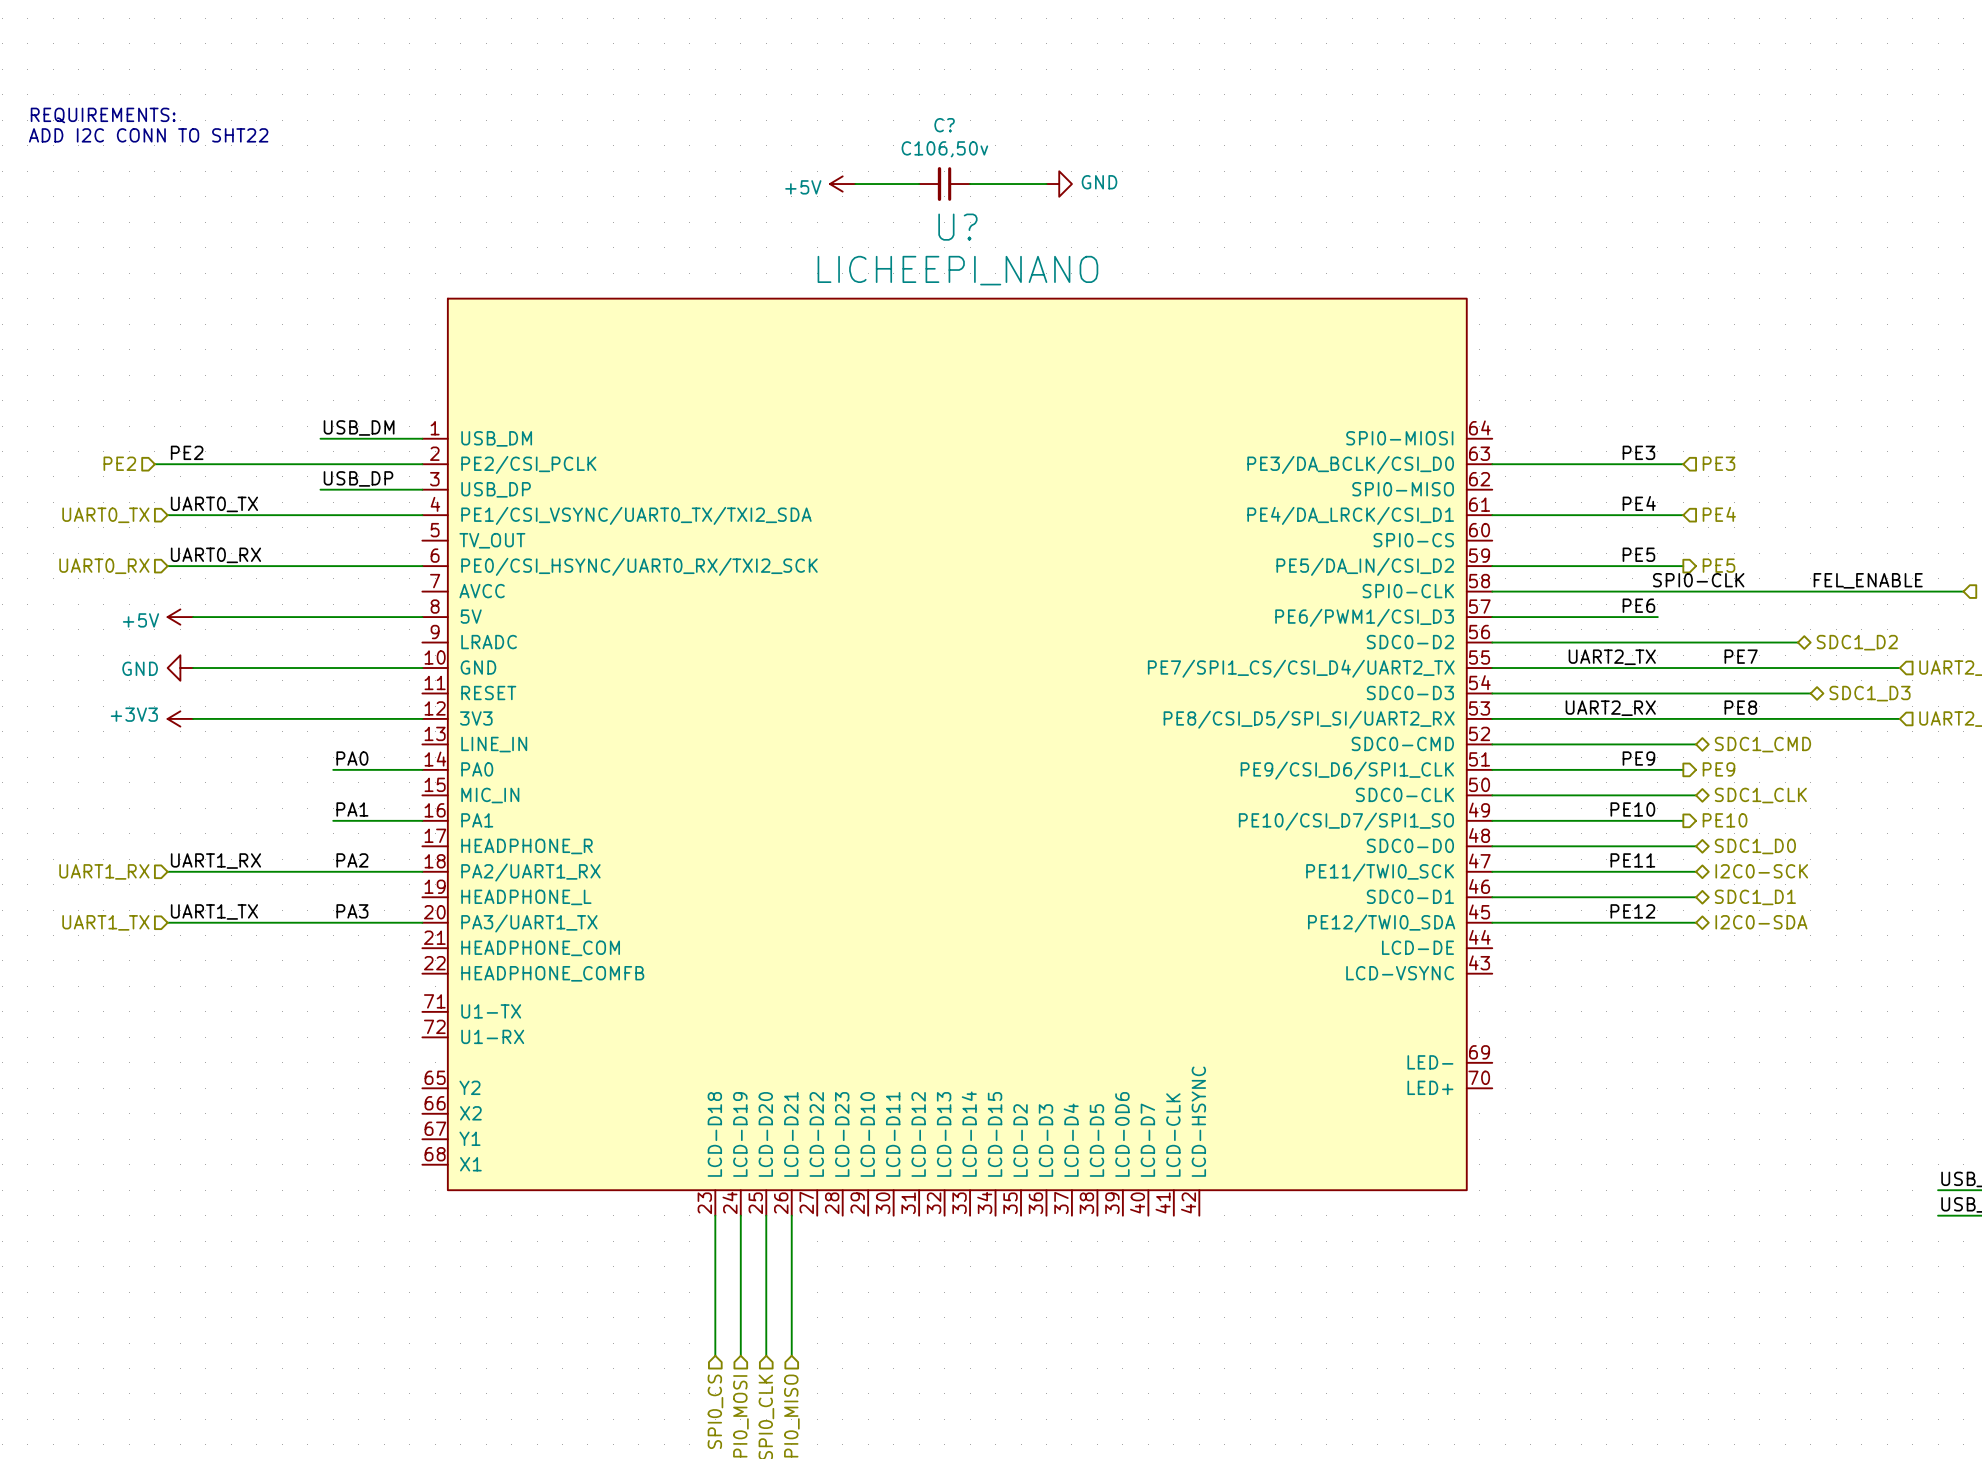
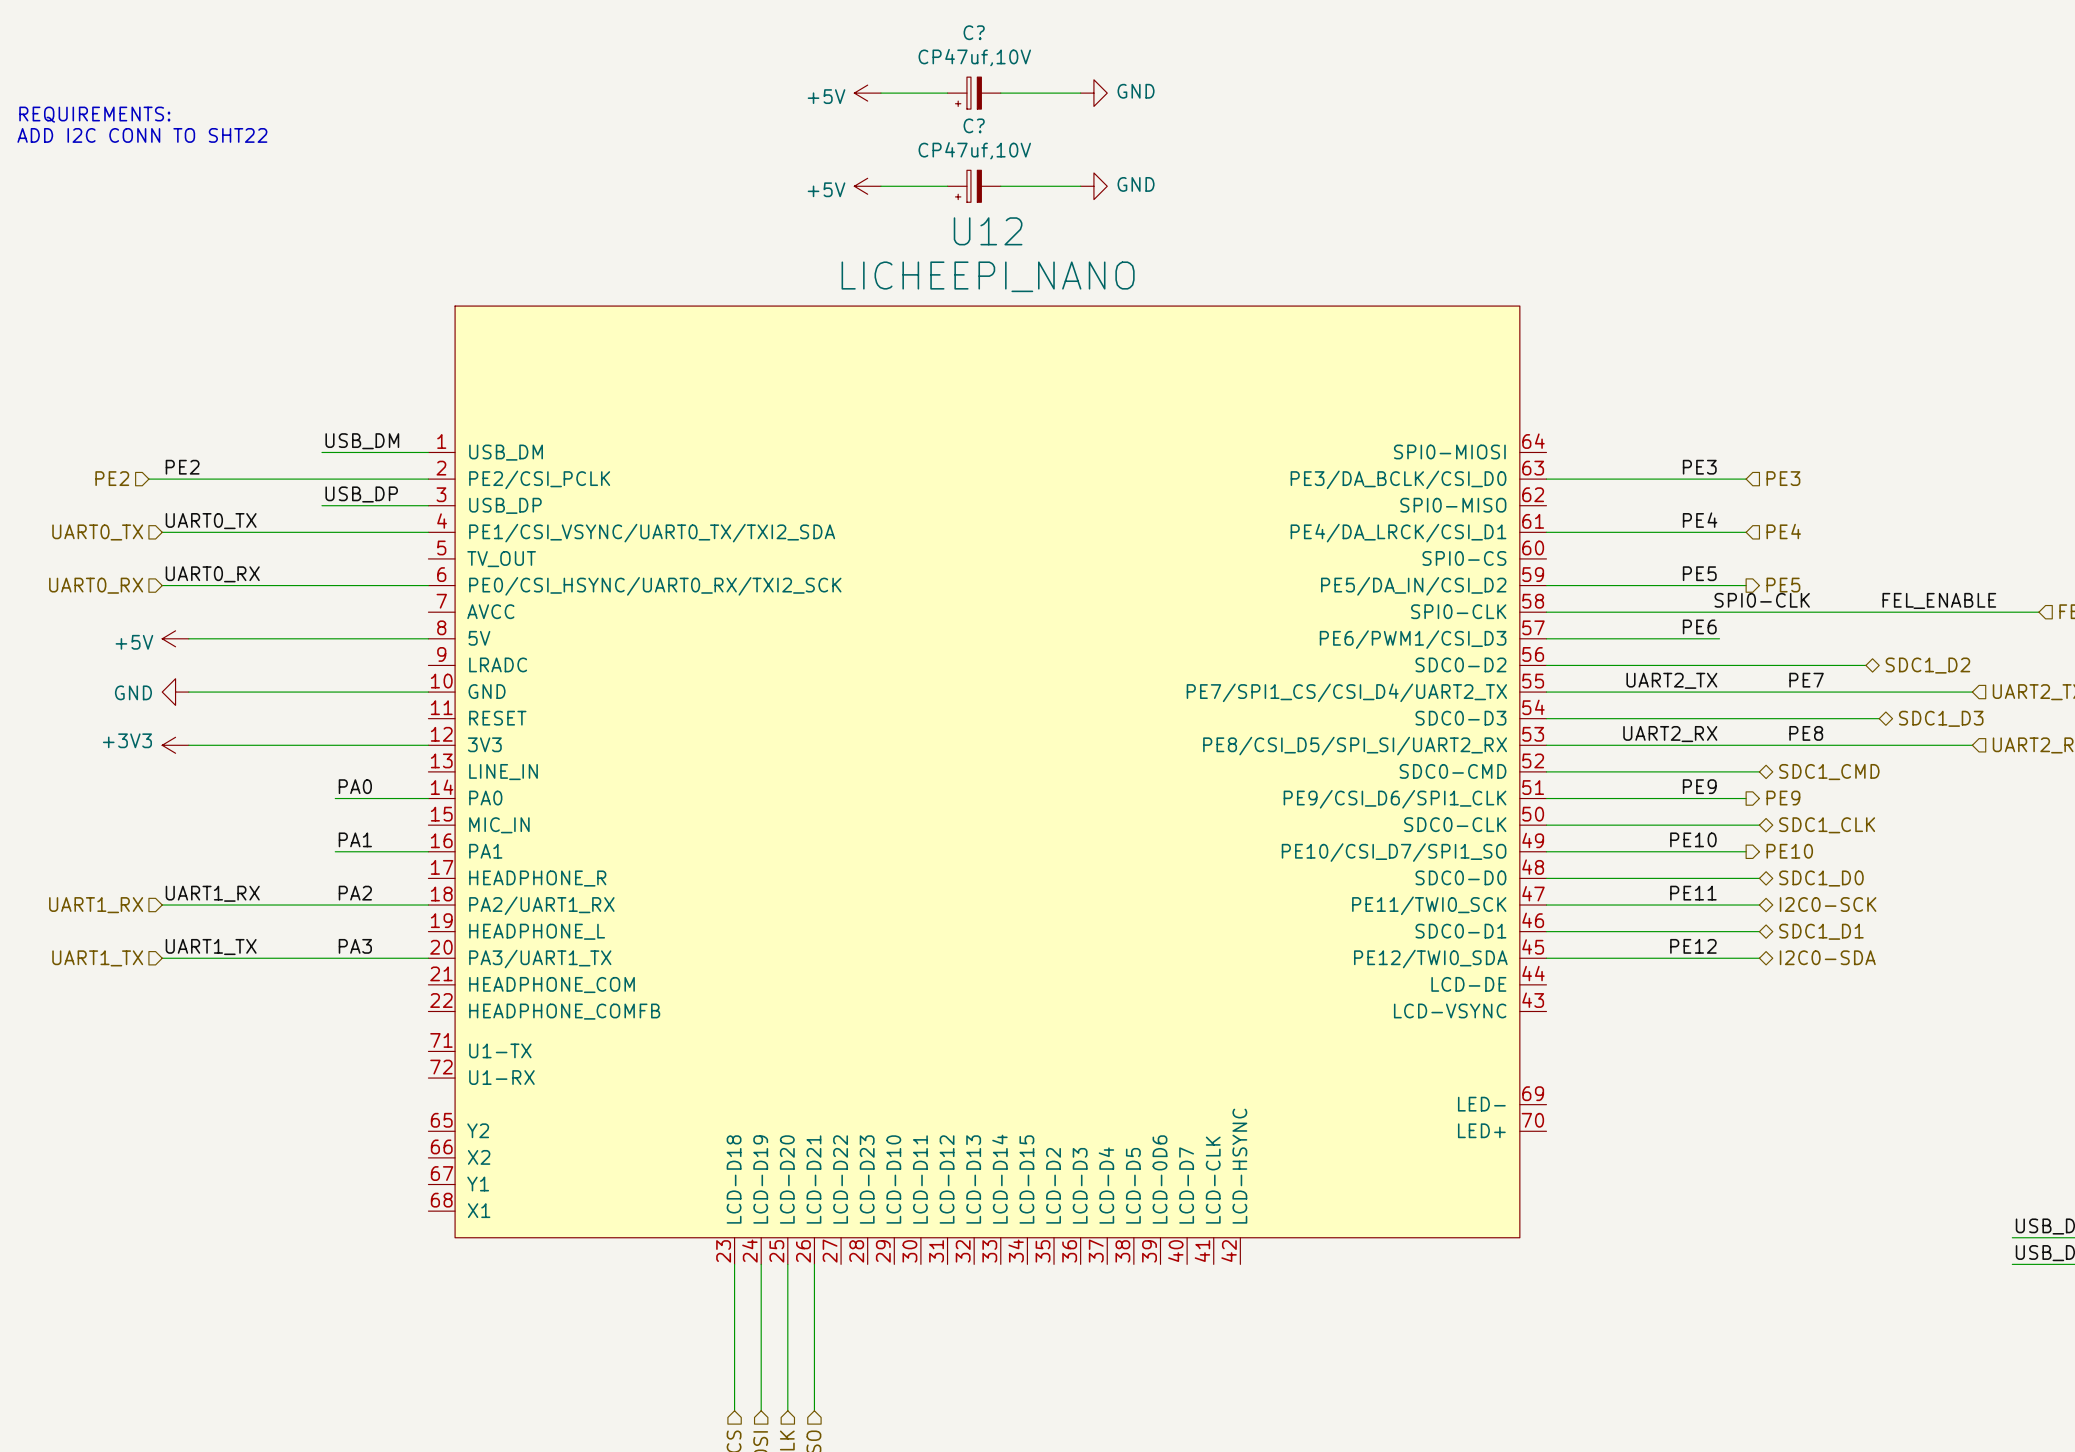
power symbol: none -> +5V (867, 93)
wire: none -> (880, 93) (947, 93)
C?: none -> CP47uf,10V (974, 93)
wire: none -> (1000, 93) (1080, 93)
power symbol: none -> GND (1093, 93)
C? value: C106,50v (944, 149) -> CP47uf,10V (974, 150)
C? symbol: [919, 167, 971, 201] -> [947, 170, 1001, 203]
U? name: U? (957, 227) -> U12 (988, 231)

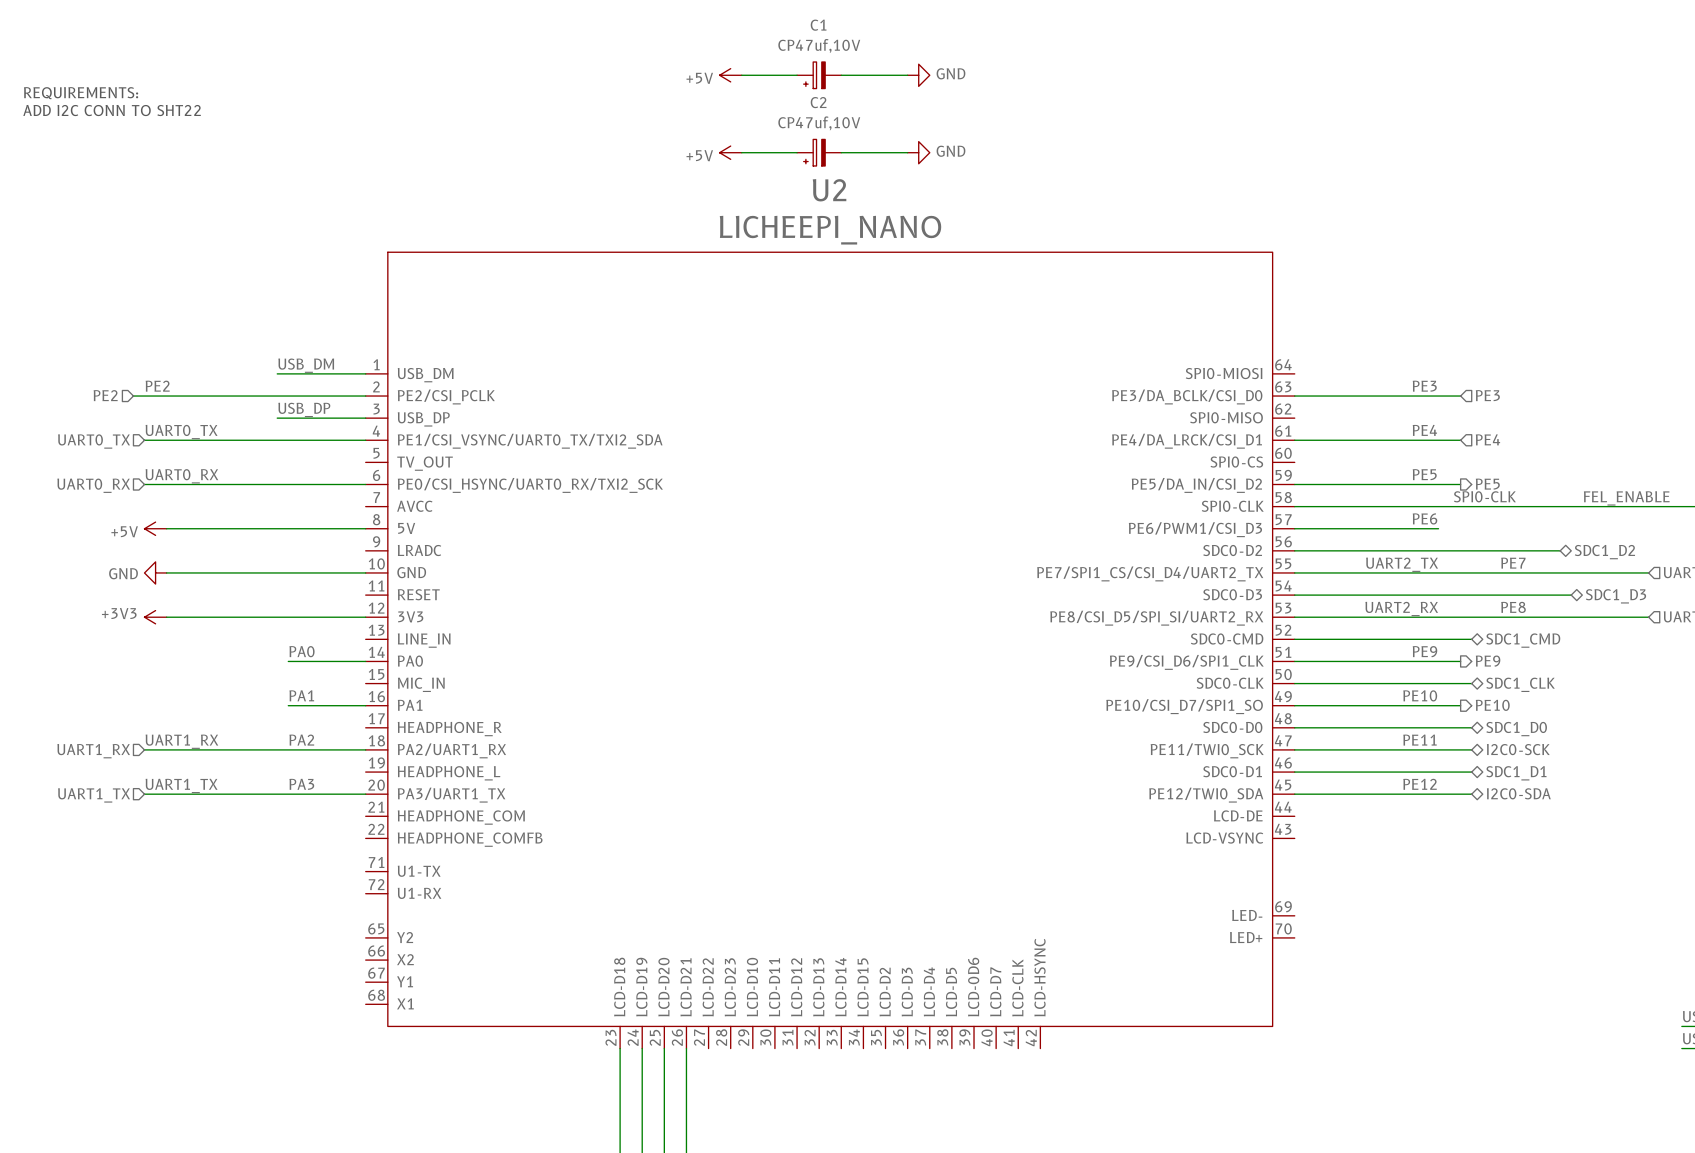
C? name: C? (974, 32) -> C1 (818, 25)
C? name: C? (974, 125) -> C2 (818, 102)
U12 name: U12 (988, 231) -> U2 (829, 190)

